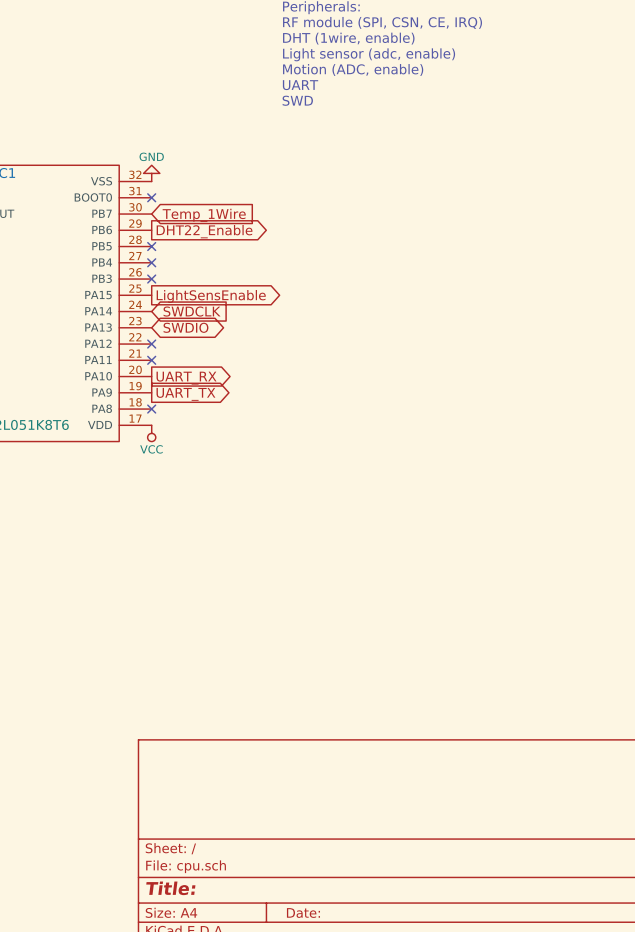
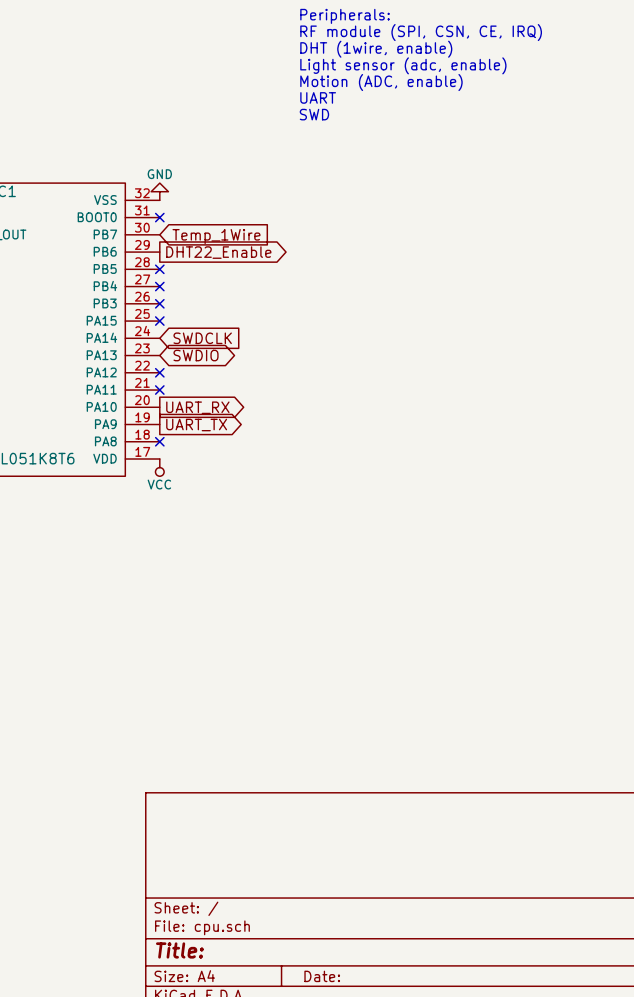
no-connect mark: none -> (159, 321)
global label: LightSensEnable (211, 296) -> none

